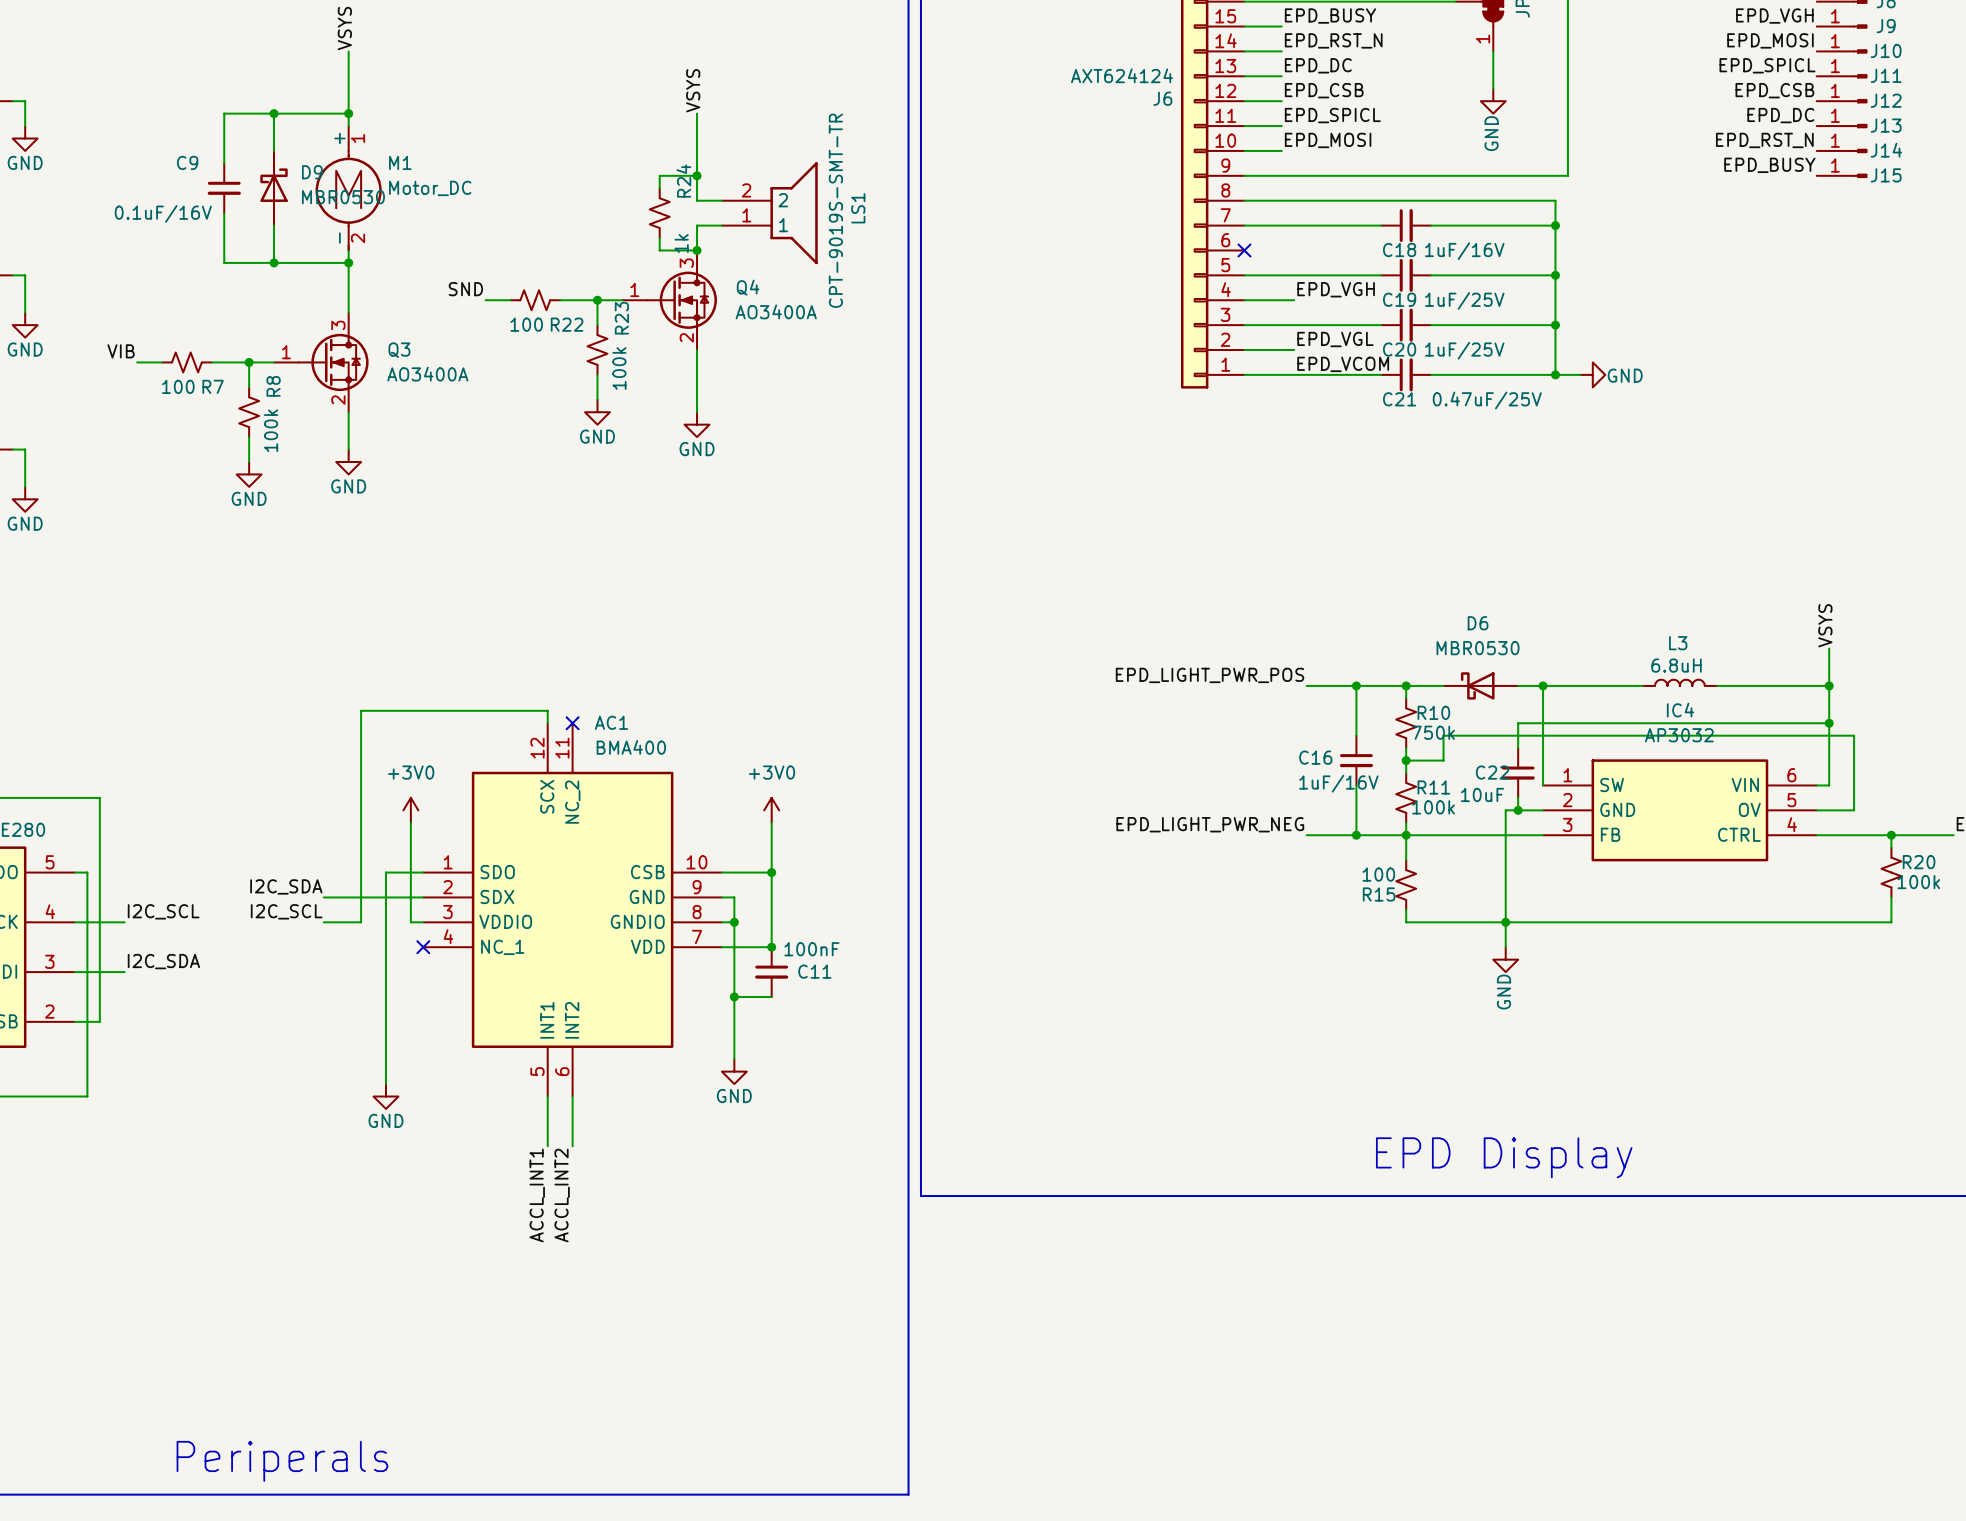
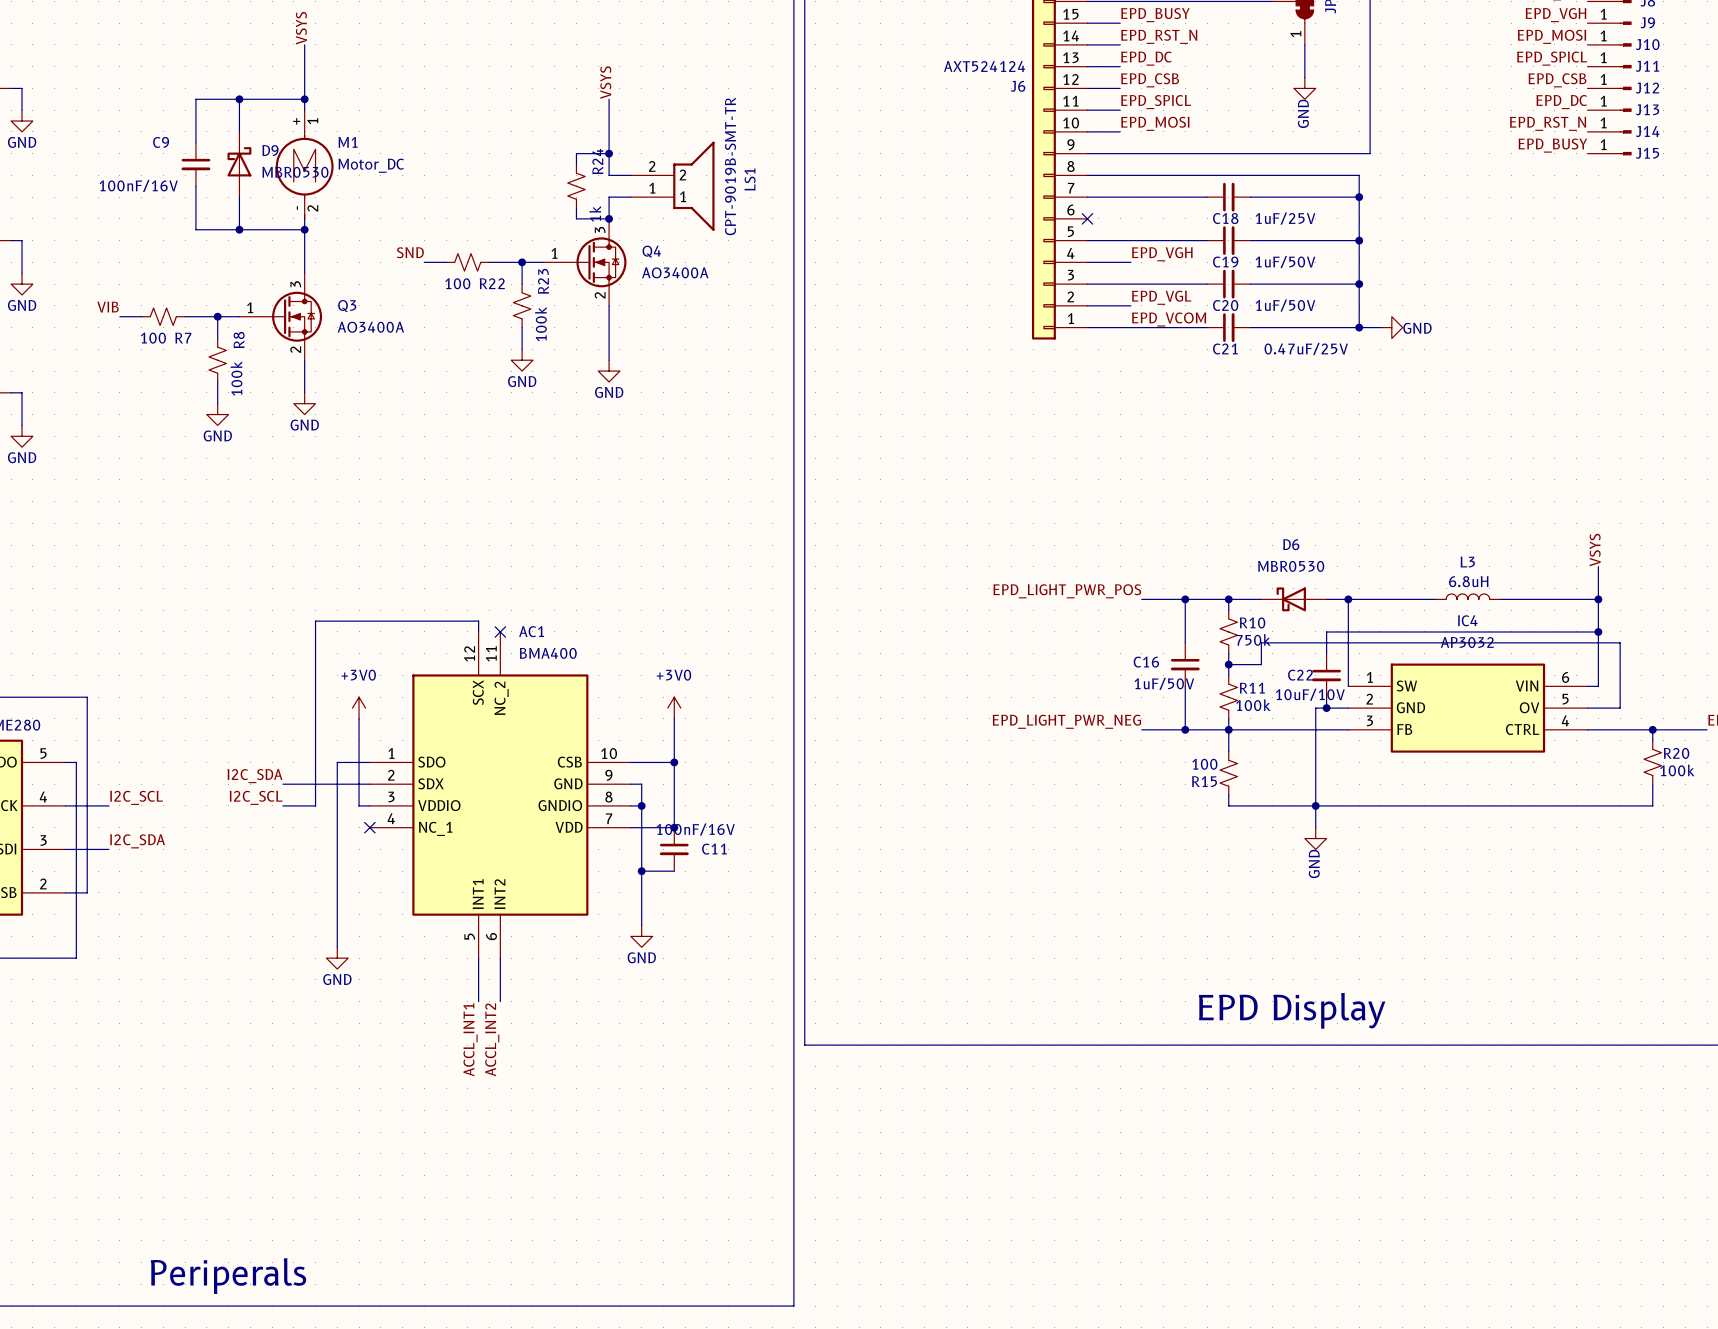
J6 value: AXT624124 (1121, 75) -> AXT524124 (984, 66)
LS1 value: CPT-9019S-SMT-TR (835, 210) -> CPT-9019B-SMT-TR (730, 166)
C9 value: 0.1uF/16V (163, 213) -> 100nF/16V (138, 185)
C18 value: 1uF/16V (1464, 251) -> 1uF/25V (1285, 218)
C19 value: 1uF/25V (1464, 300) -> 1uF/50V (1285, 262)
C20 value: 1uF/25V (1464, 350) -> 1uF/50V (1285, 305)
C16 value: 1uF/16V (1338, 783) -> 1uF/50V (1164, 683)
C22 value: 10uF (1482, 794) -> 10uF/10V (1310, 694)
C11 value: 100nF (811, 949) -> 100nF/16V (695, 829)

